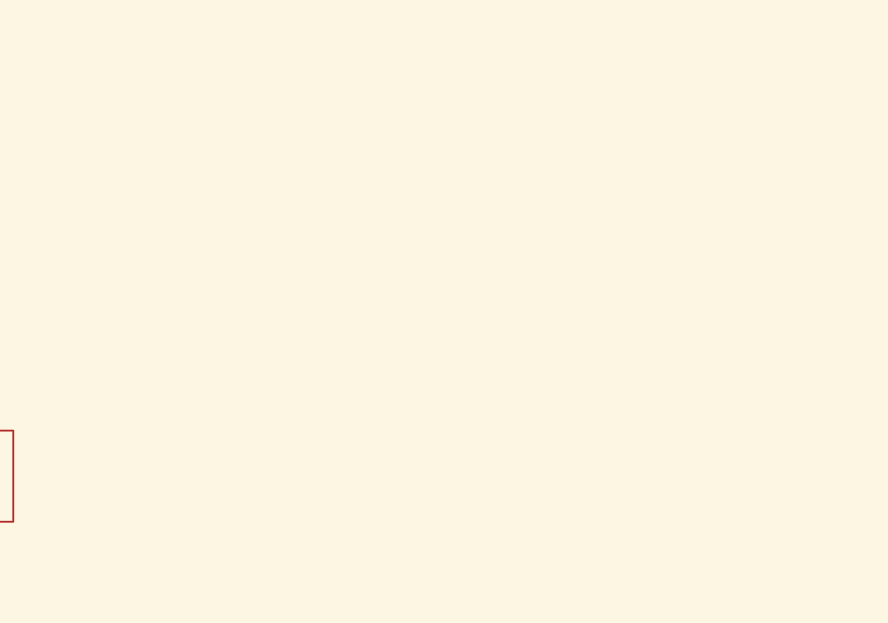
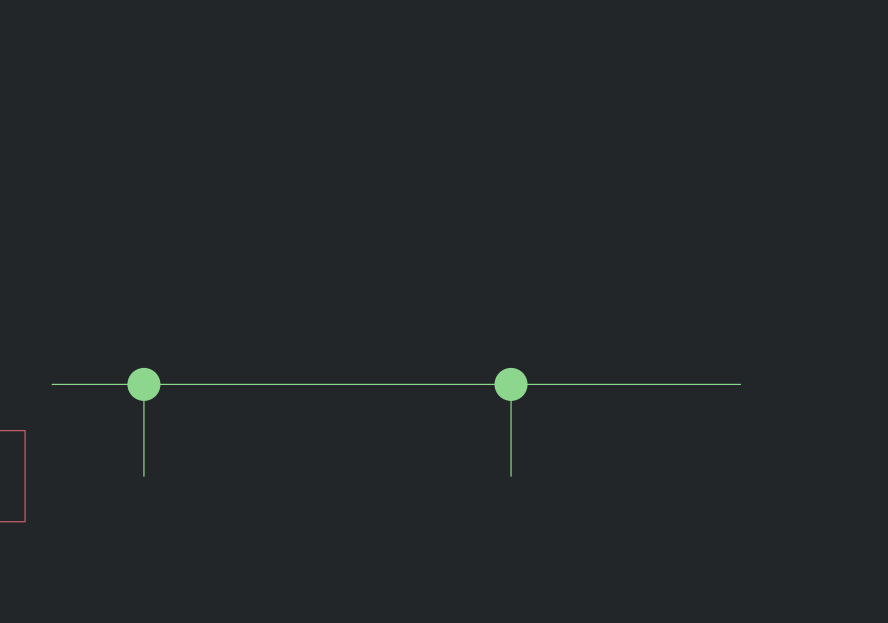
wire: none -> (52, 384) (740, 384)
wire: none -> (143, 384) (143, 476)
junction: none -> (143, 384)
wire: none -> (511, 384) (511, 476)
junction: none -> (511, 384)

